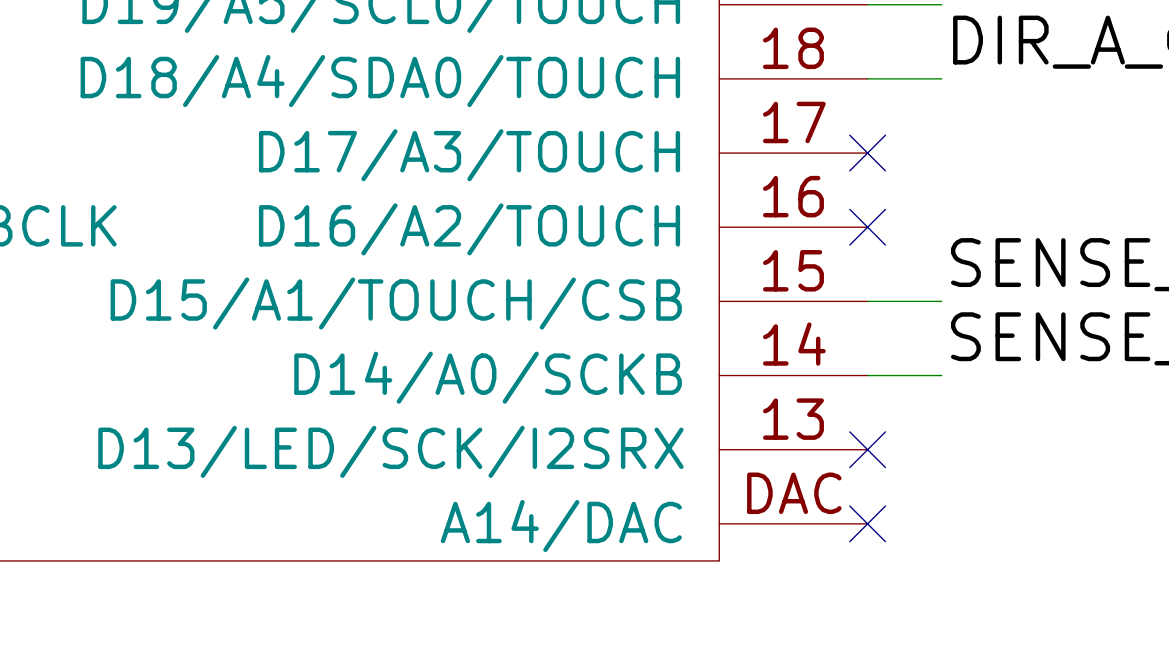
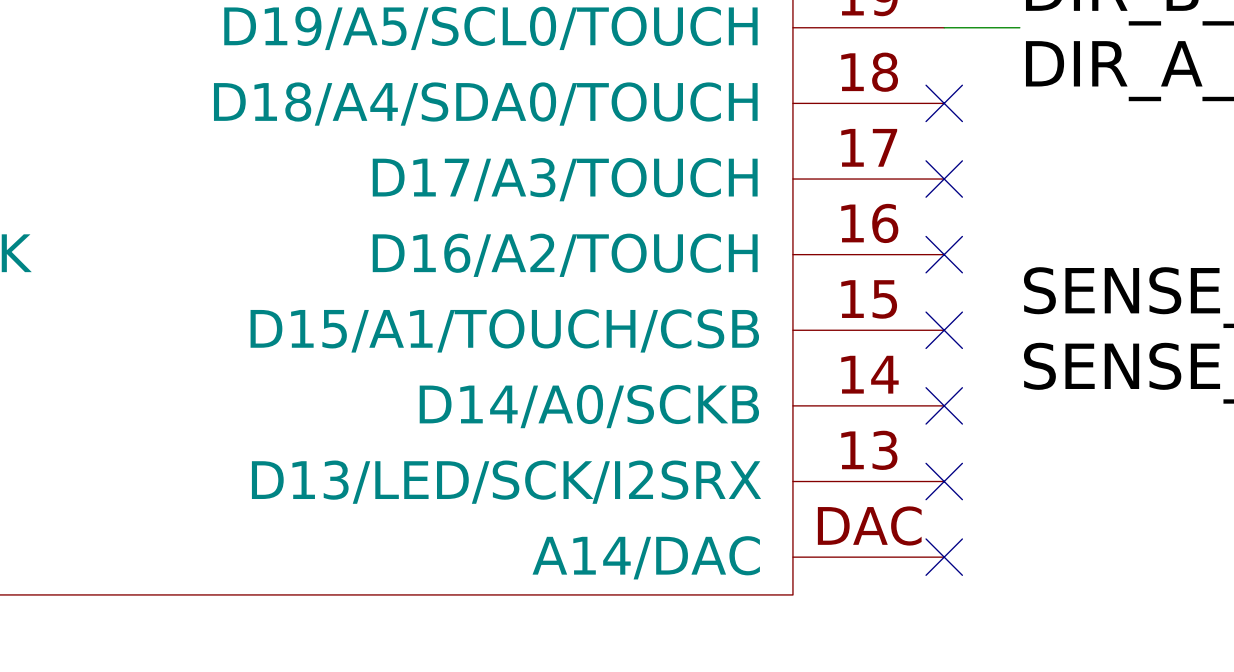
wire: (867, 78) (941, 78) -> none
no-connect mark: none -> (944, 103)
wire: (867, 301) (941, 301) -> none
no-connect mark: none -> (944, 330)
wire: (867, 375) (941, 375) -> none
no-connect mark: none -> (944, 405)

